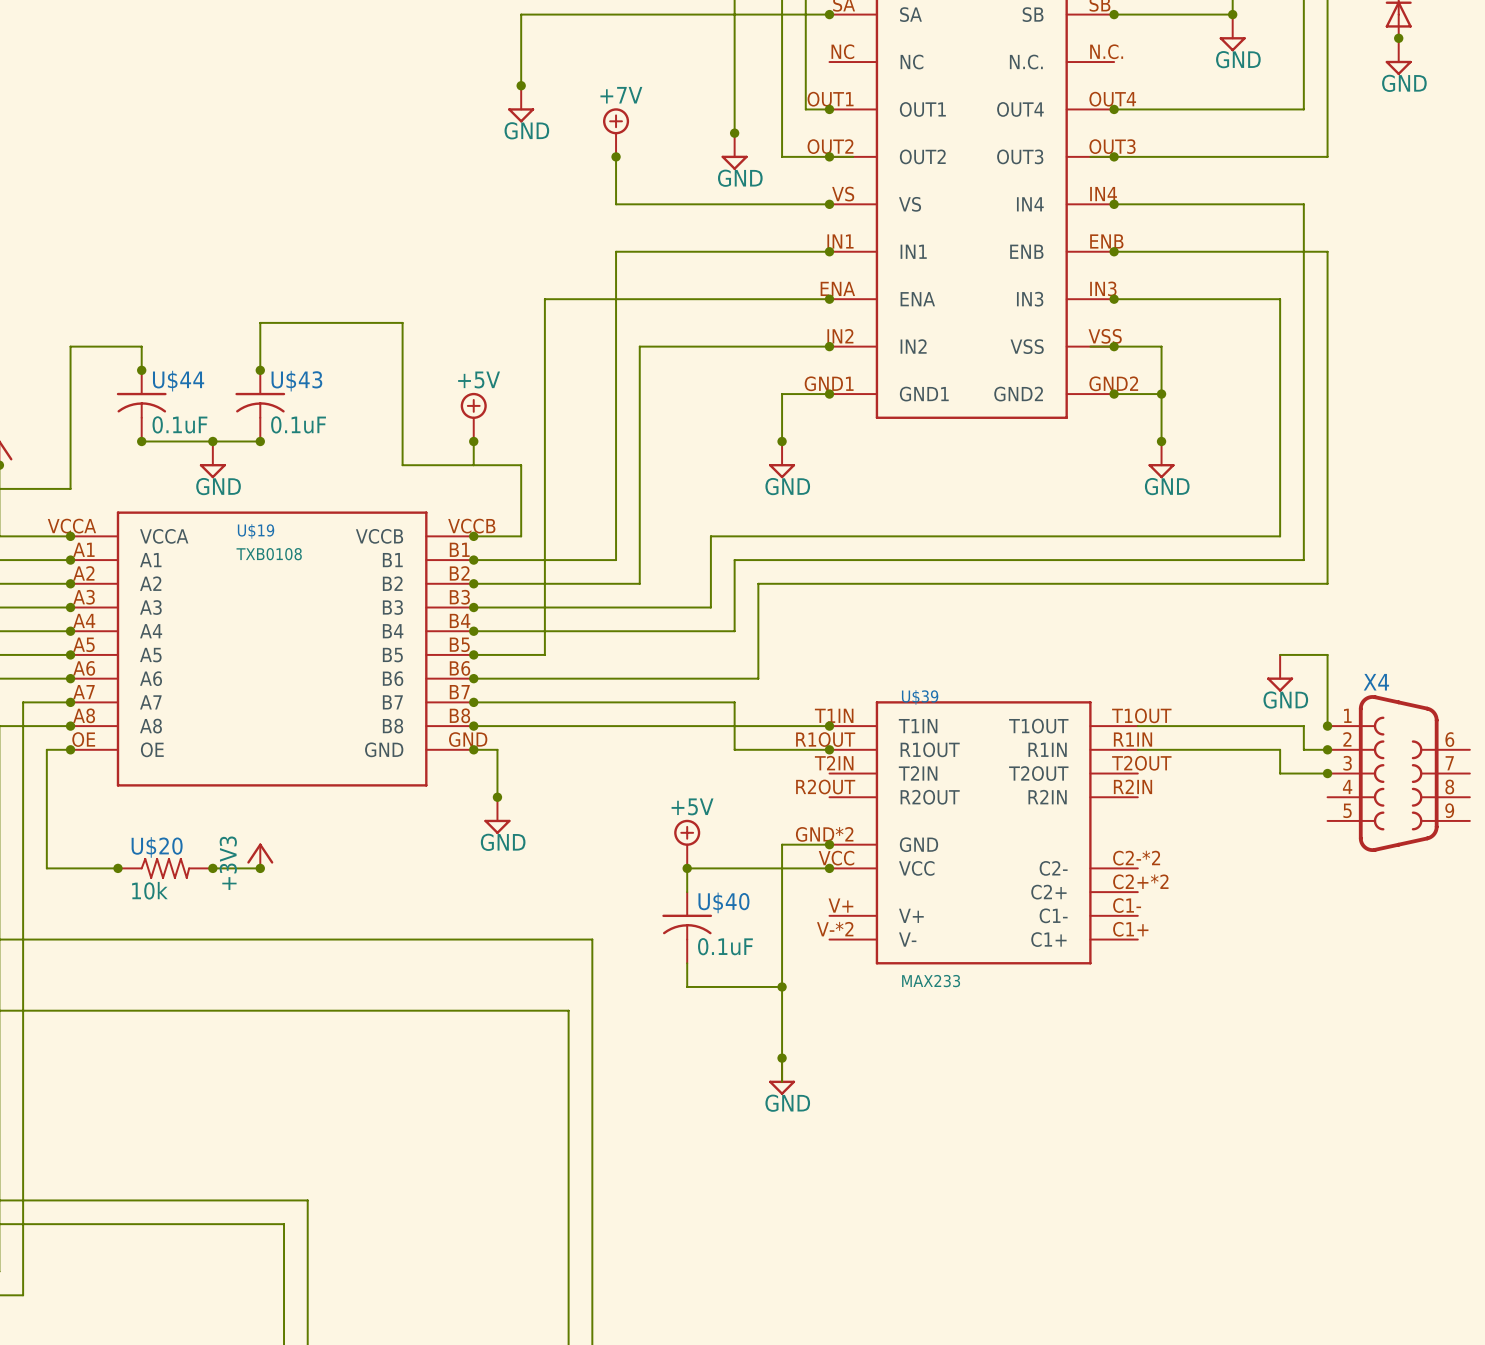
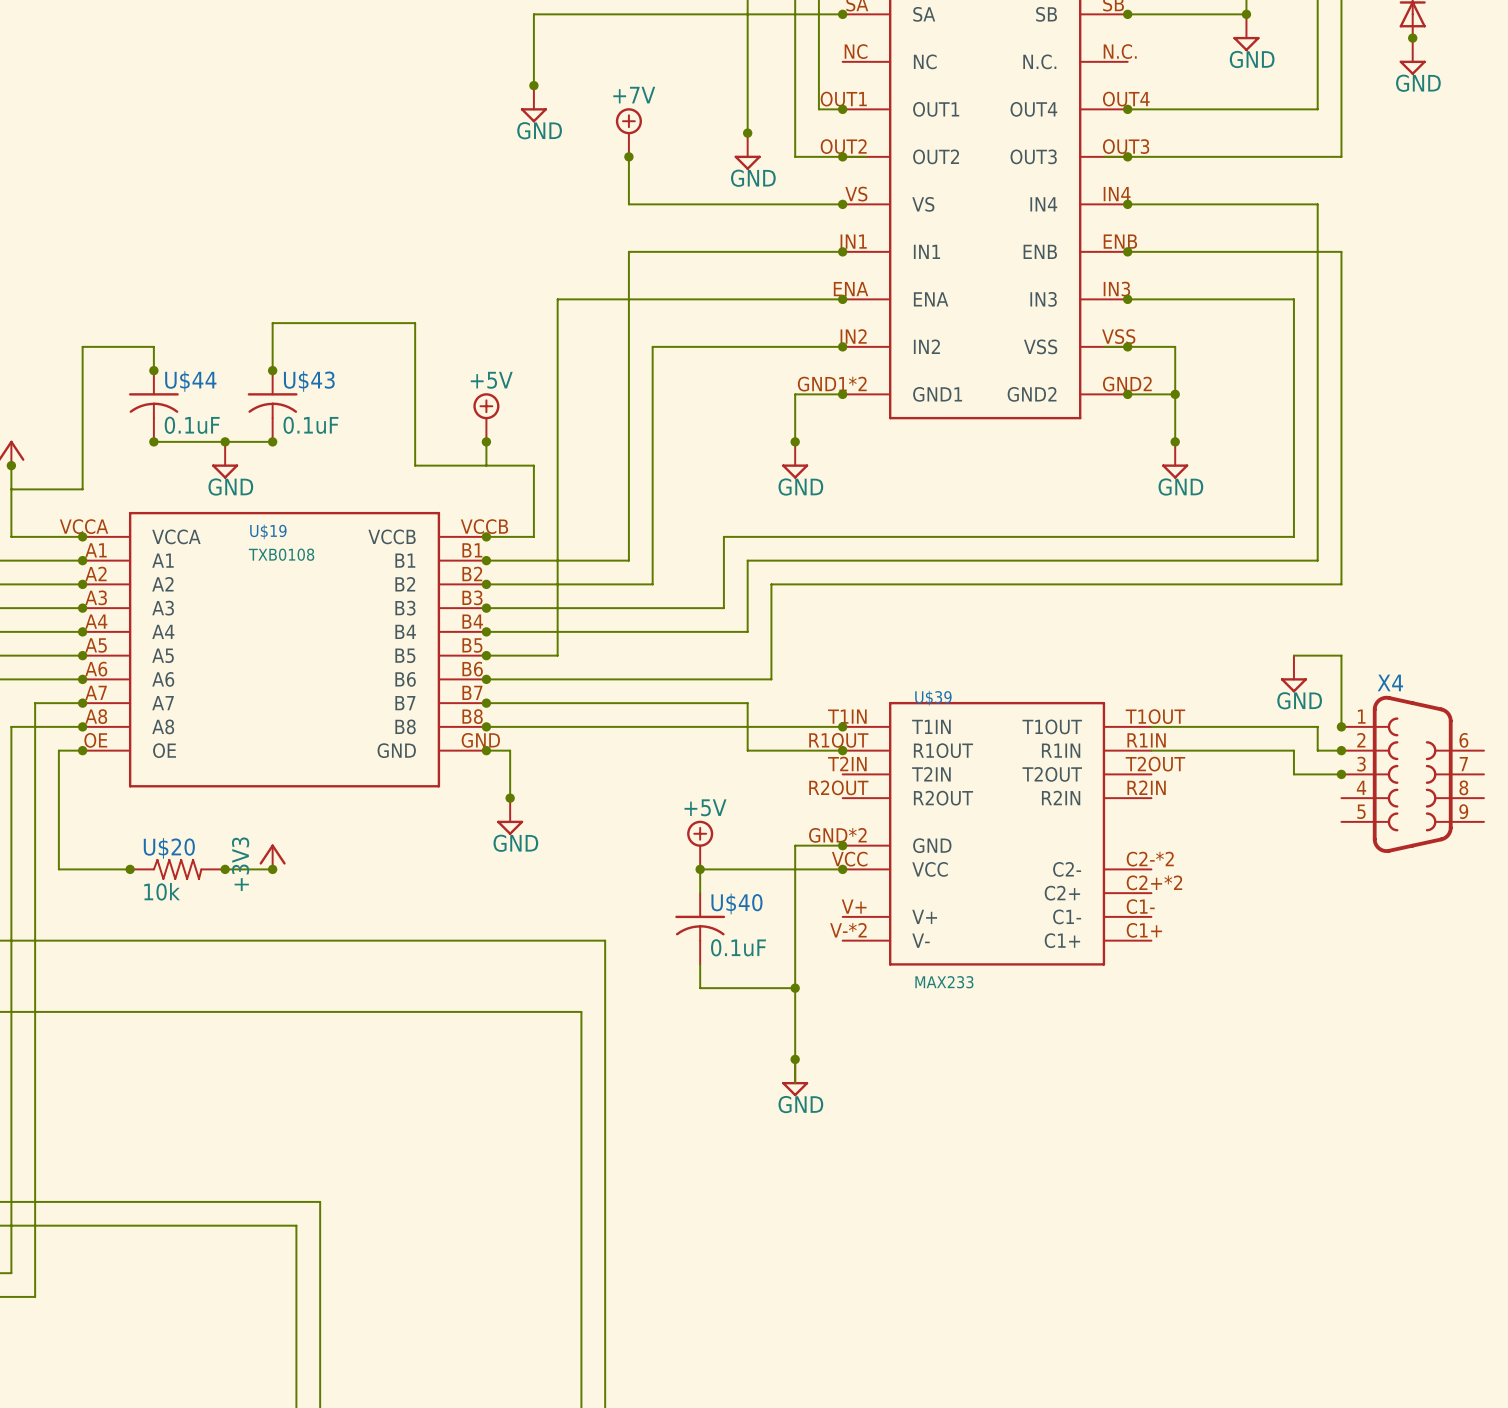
part pin number: GND1 (829, 383) -> GND1*2 (832, 384)

